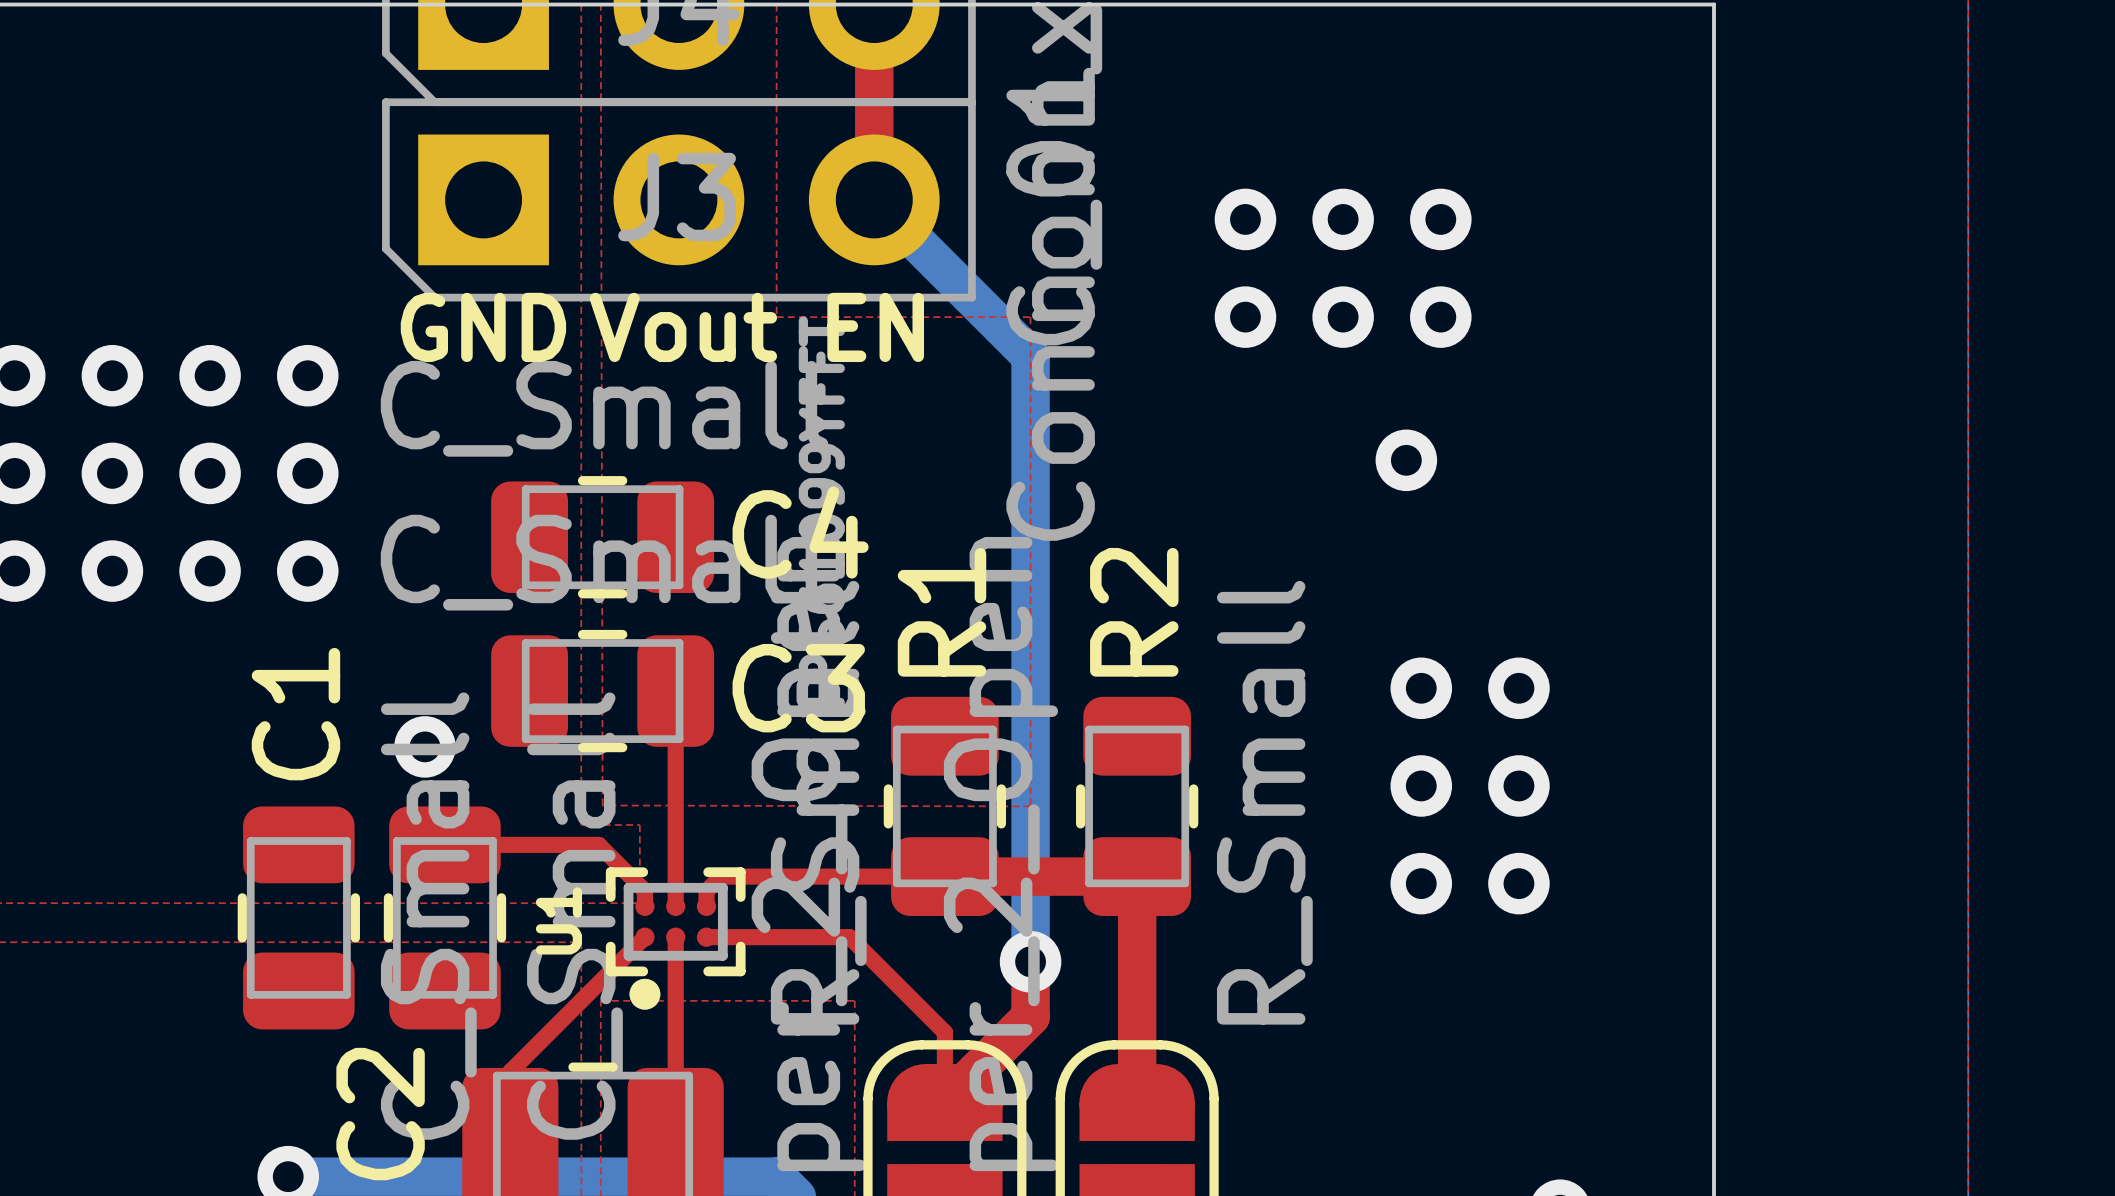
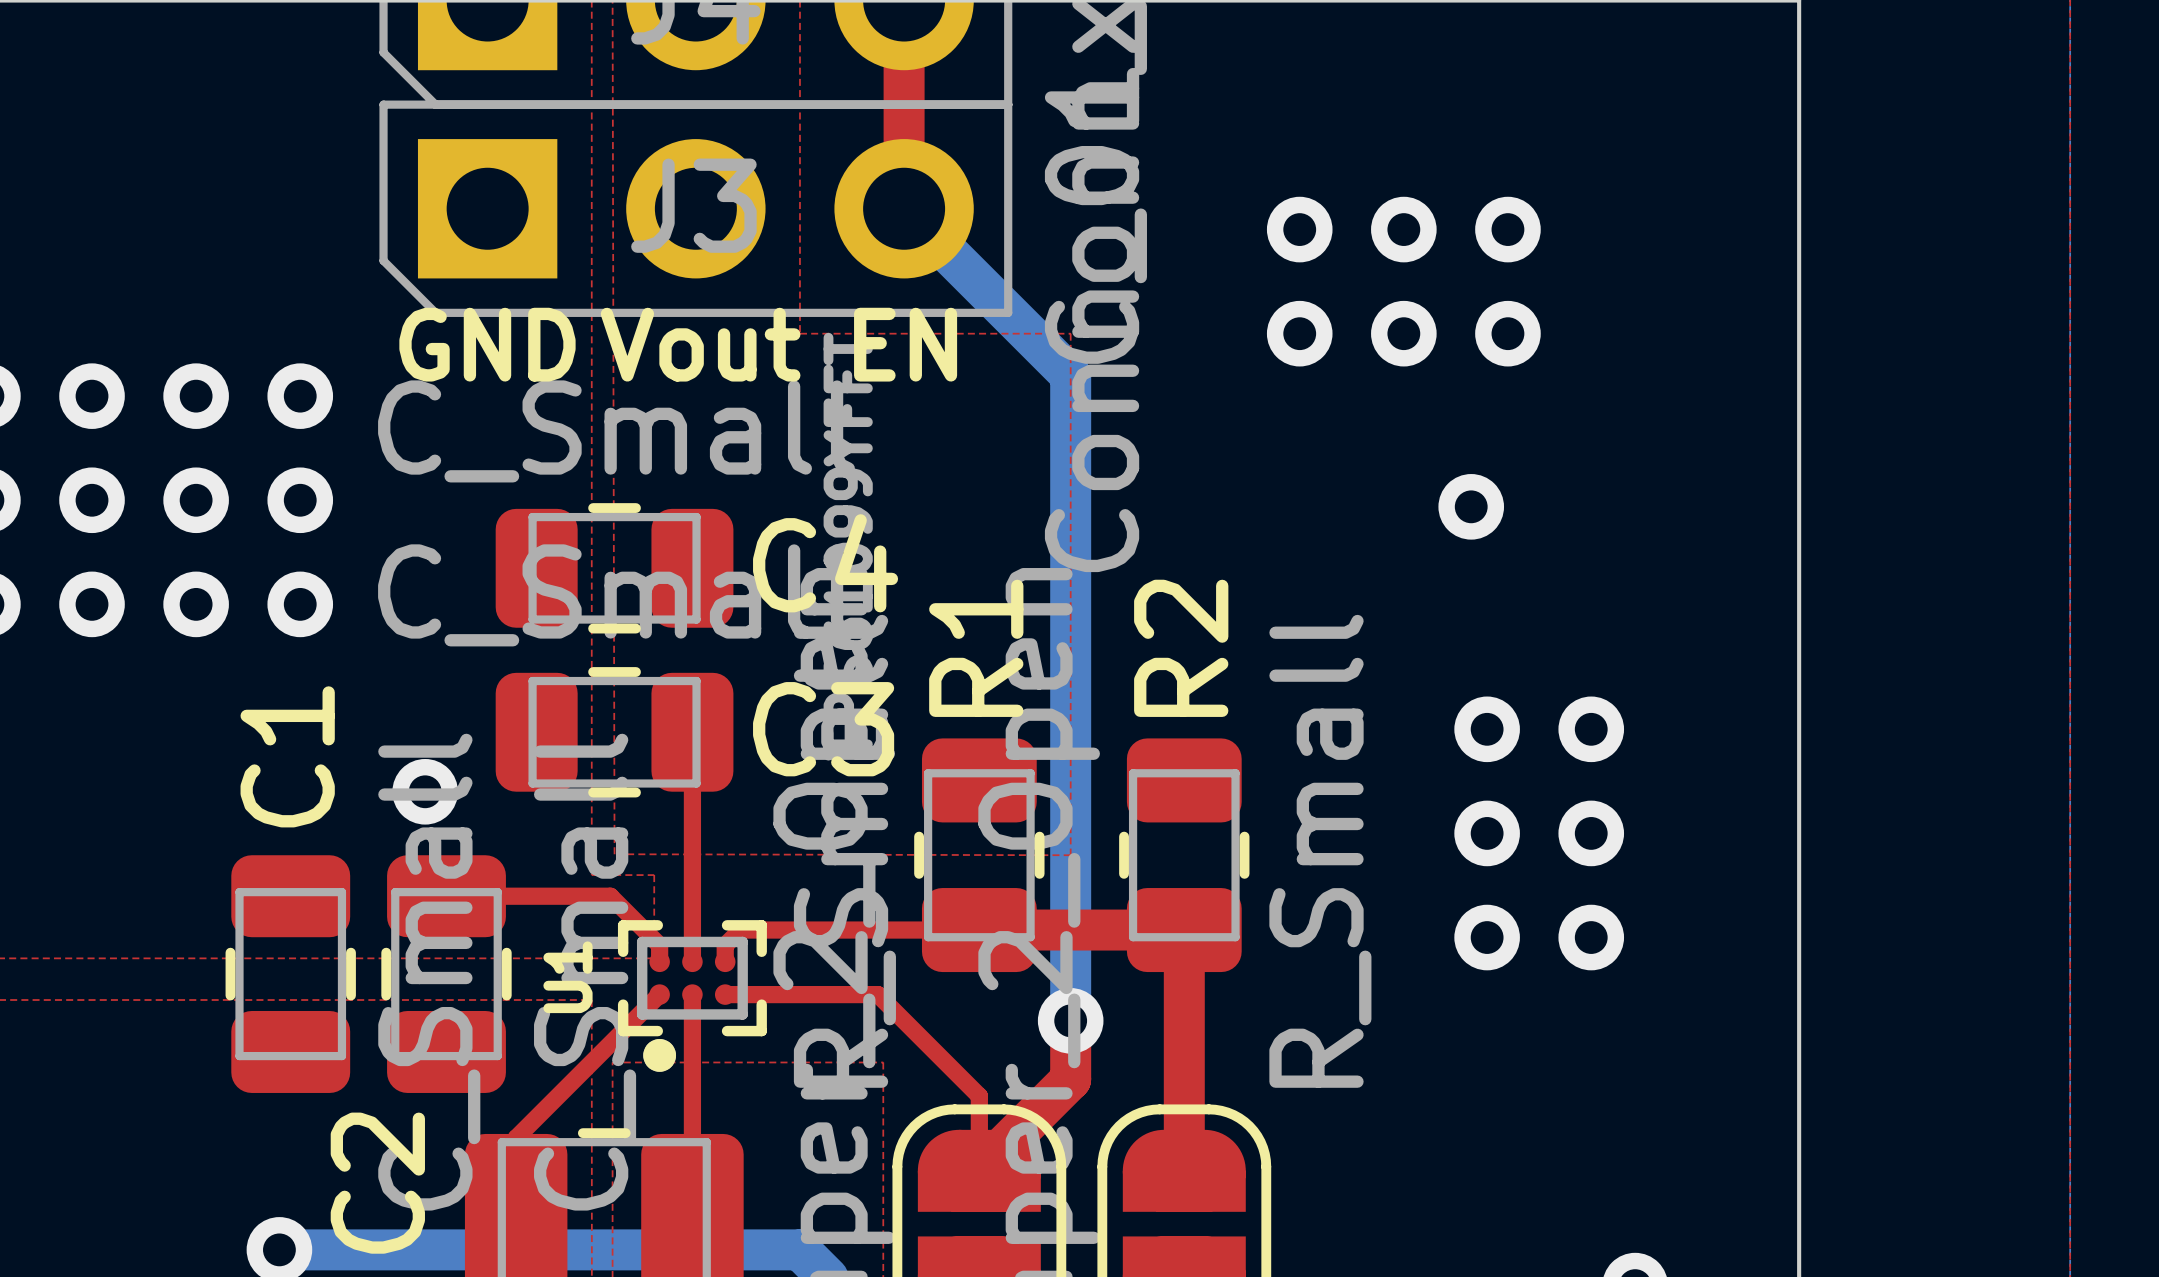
via position: (1406, 460) -> (1471, 506)

